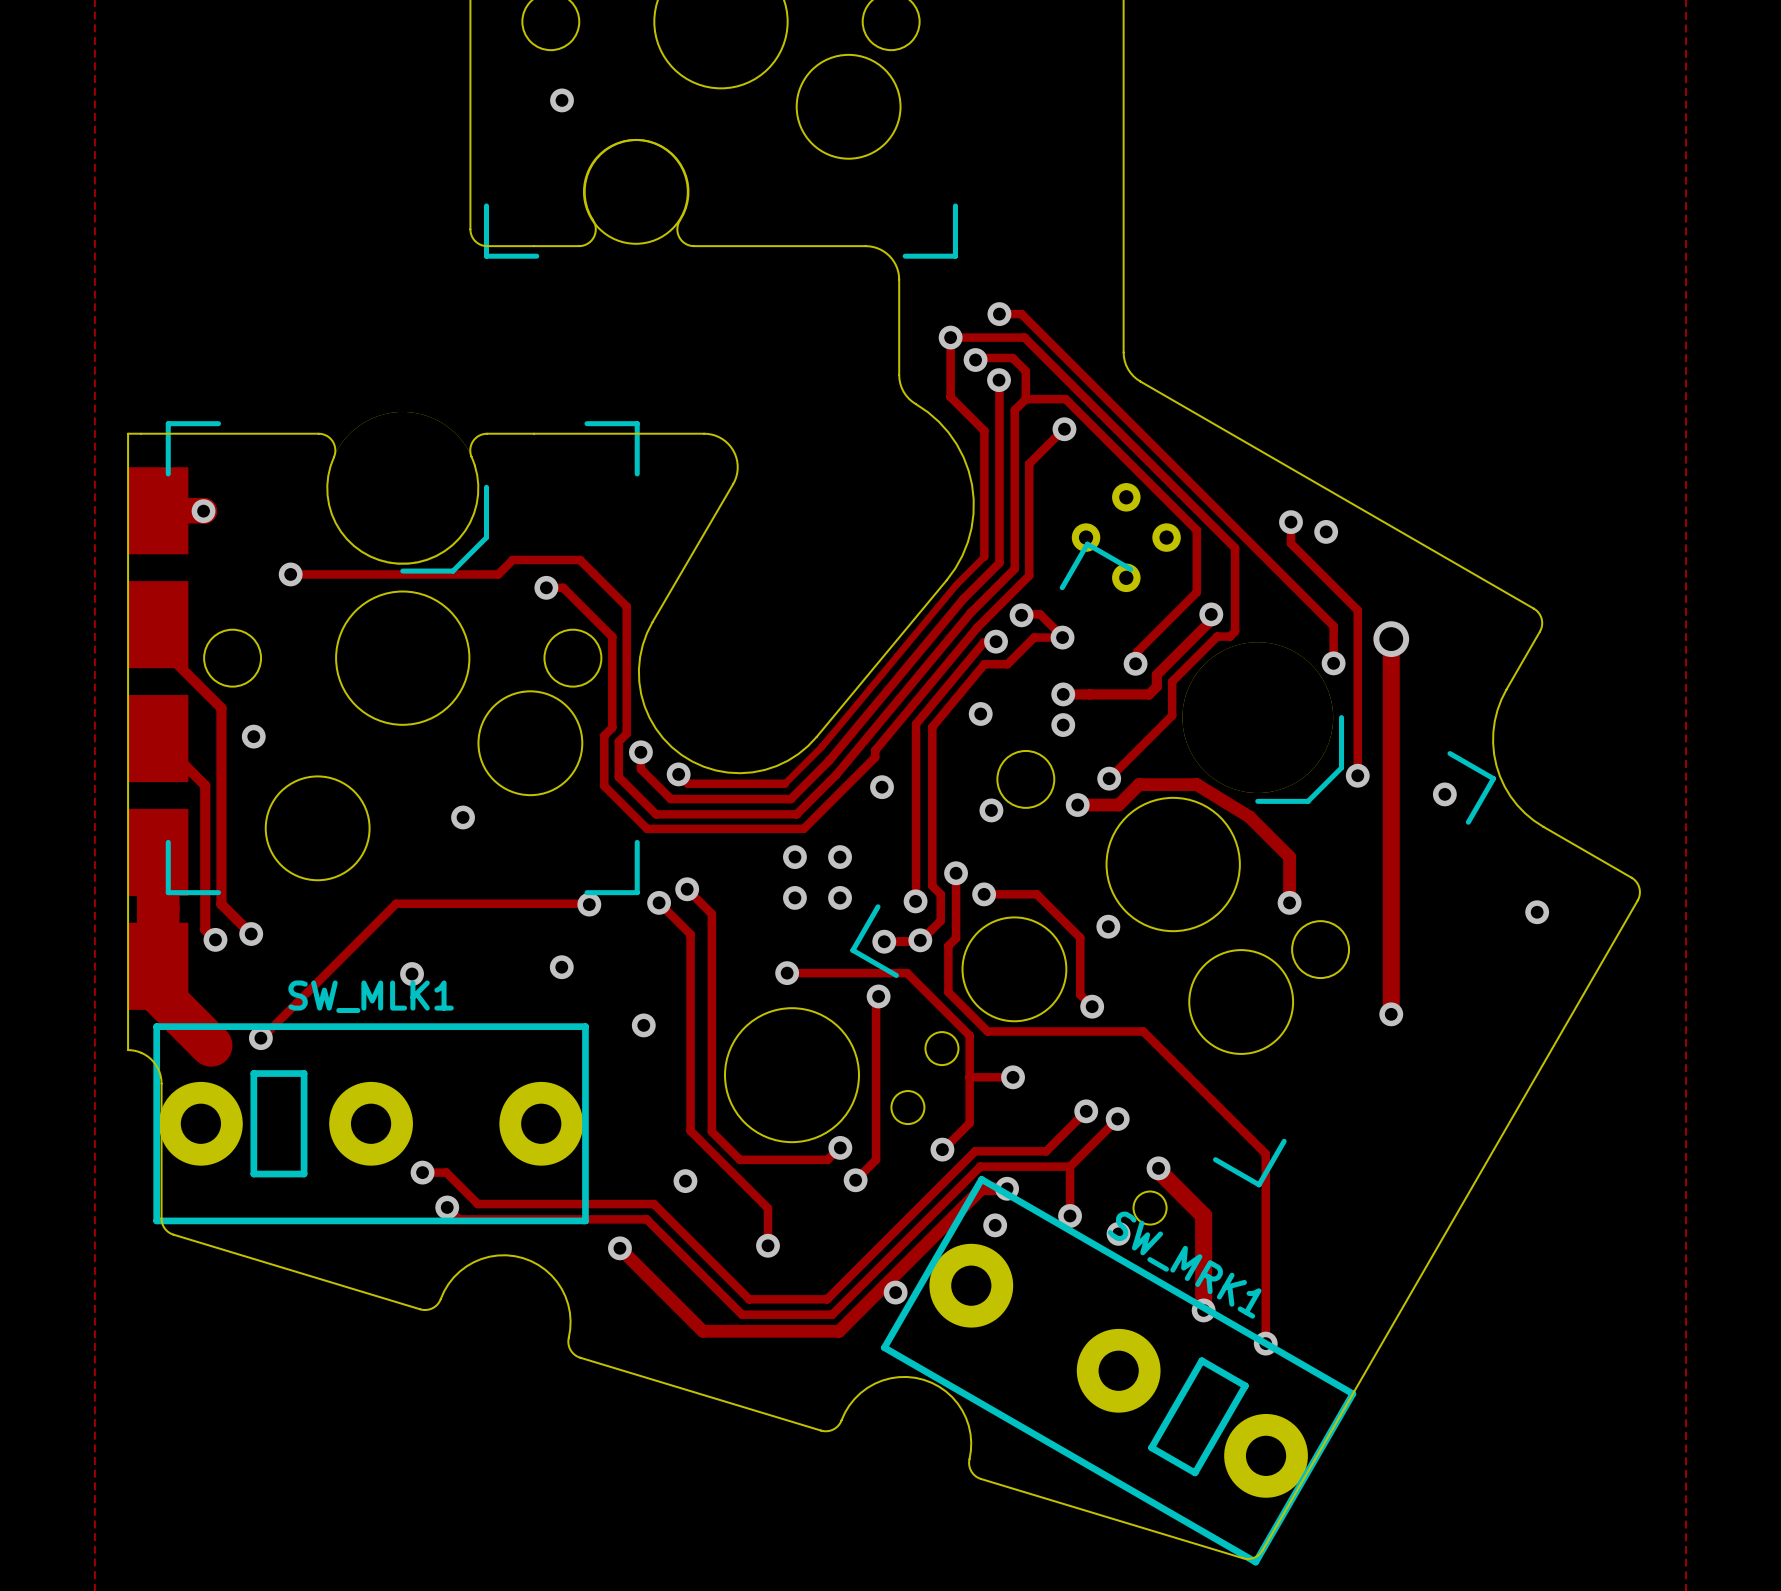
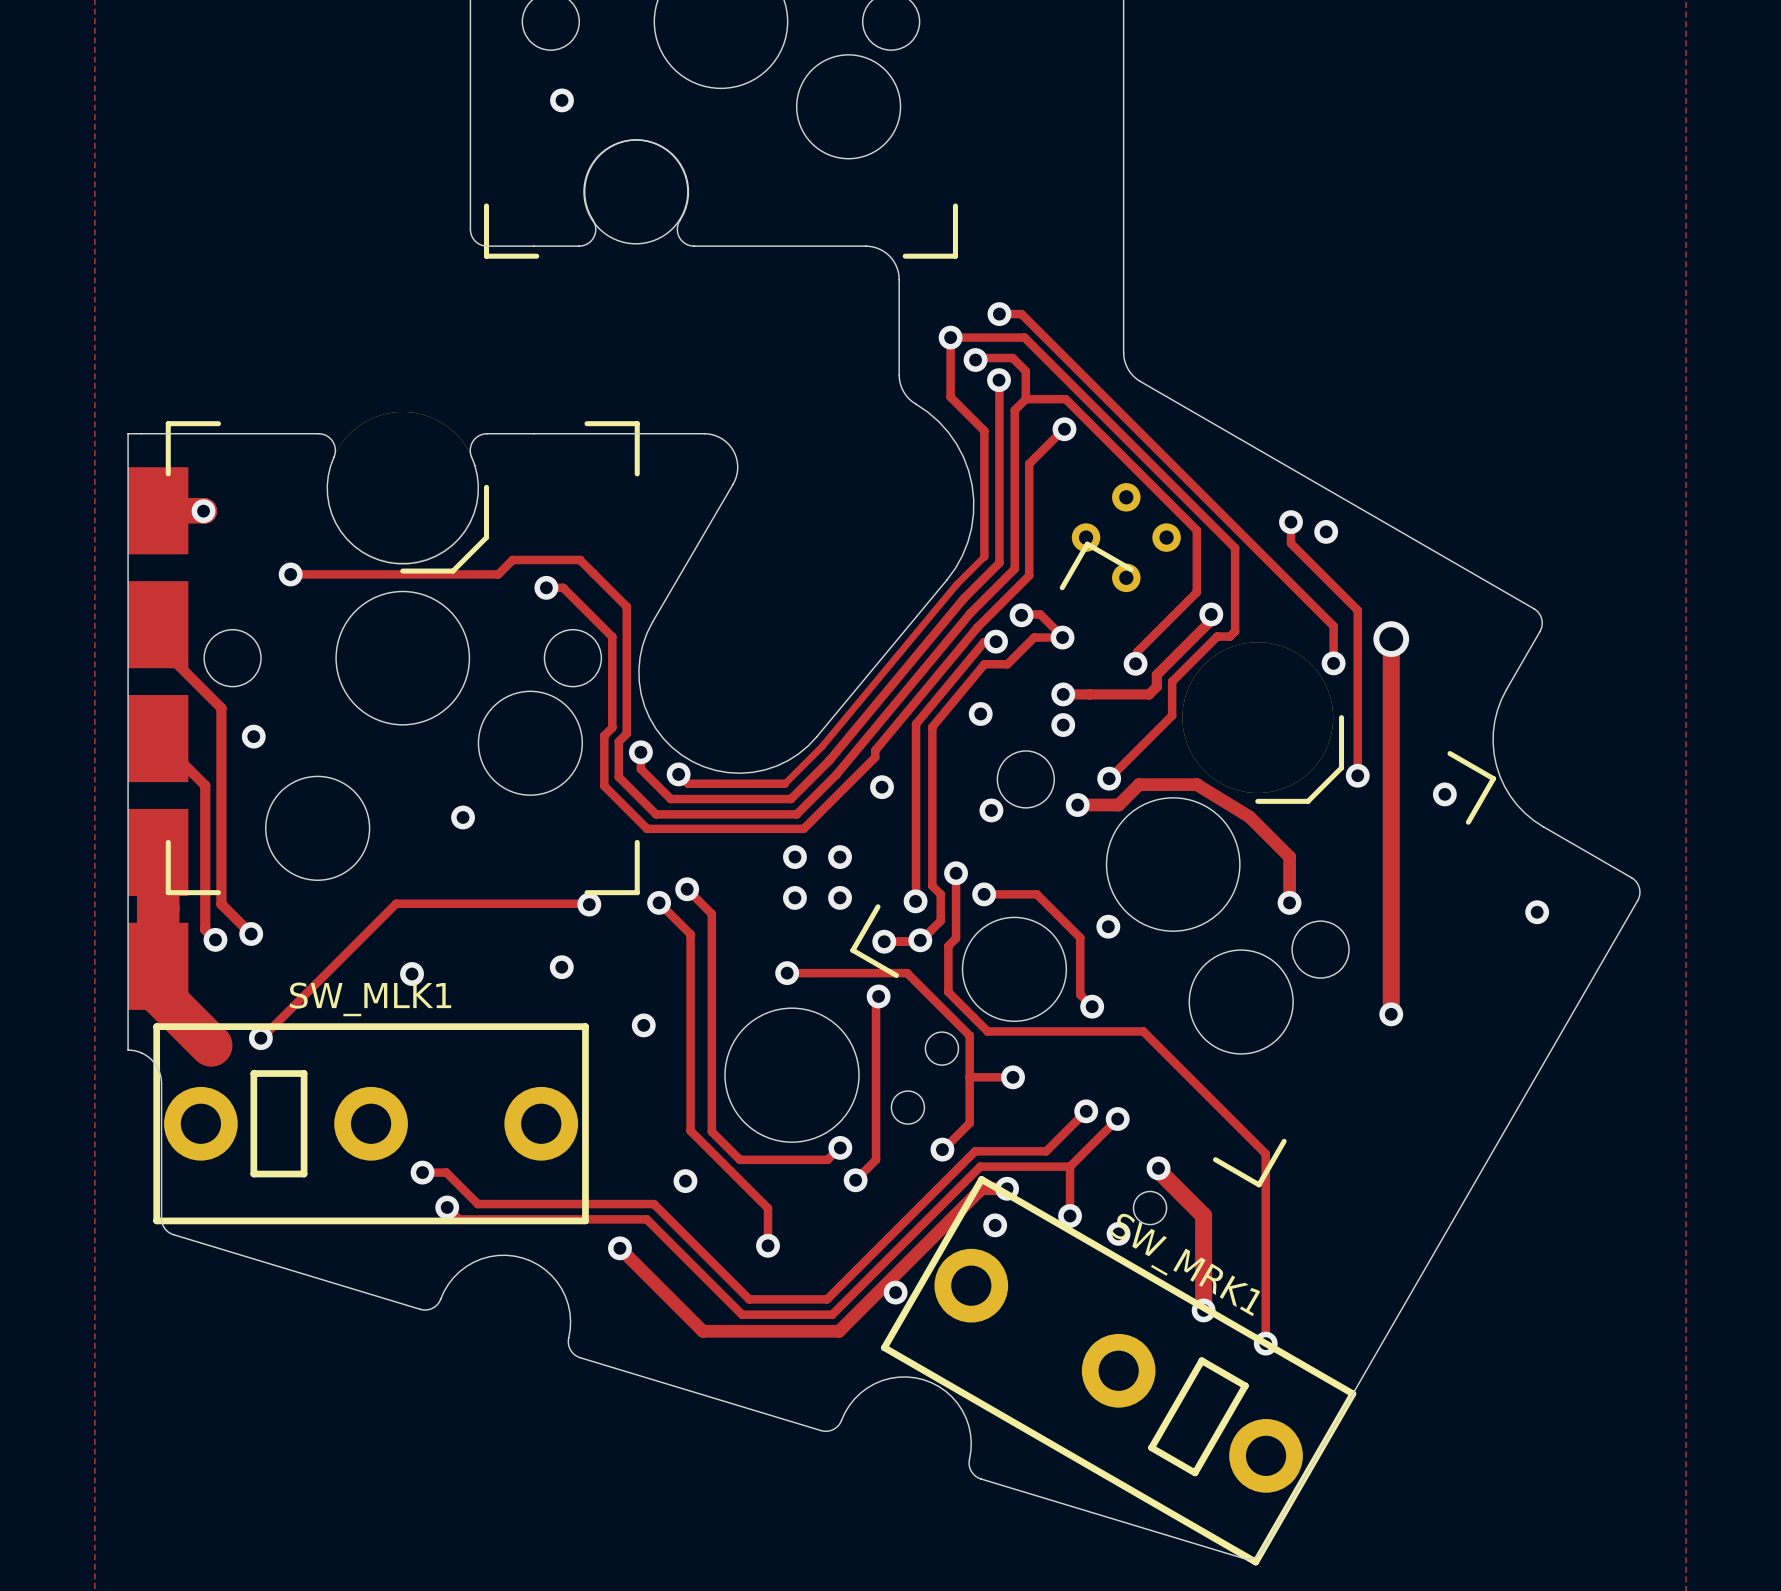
SW_MLK1 footprint: [153, 1023, 589, 1225] -> [153, 1023, 589, 1225]
SW_MRK1 footprint: [881, 1176, 1357, 1566] -> [881, 1176, 1357, 1566]

